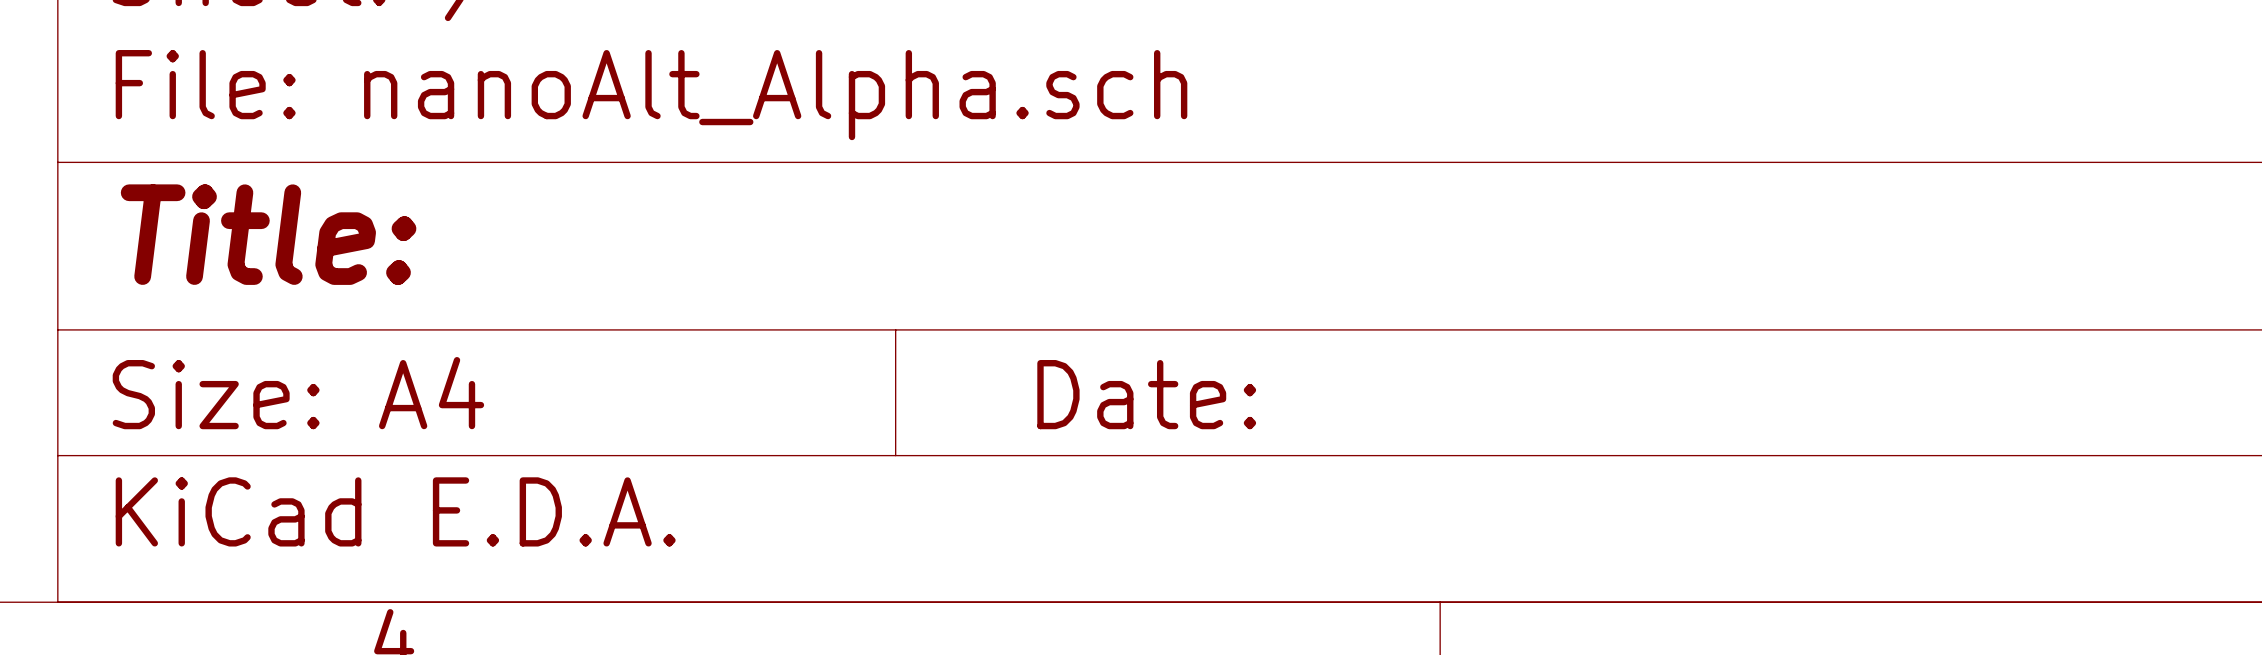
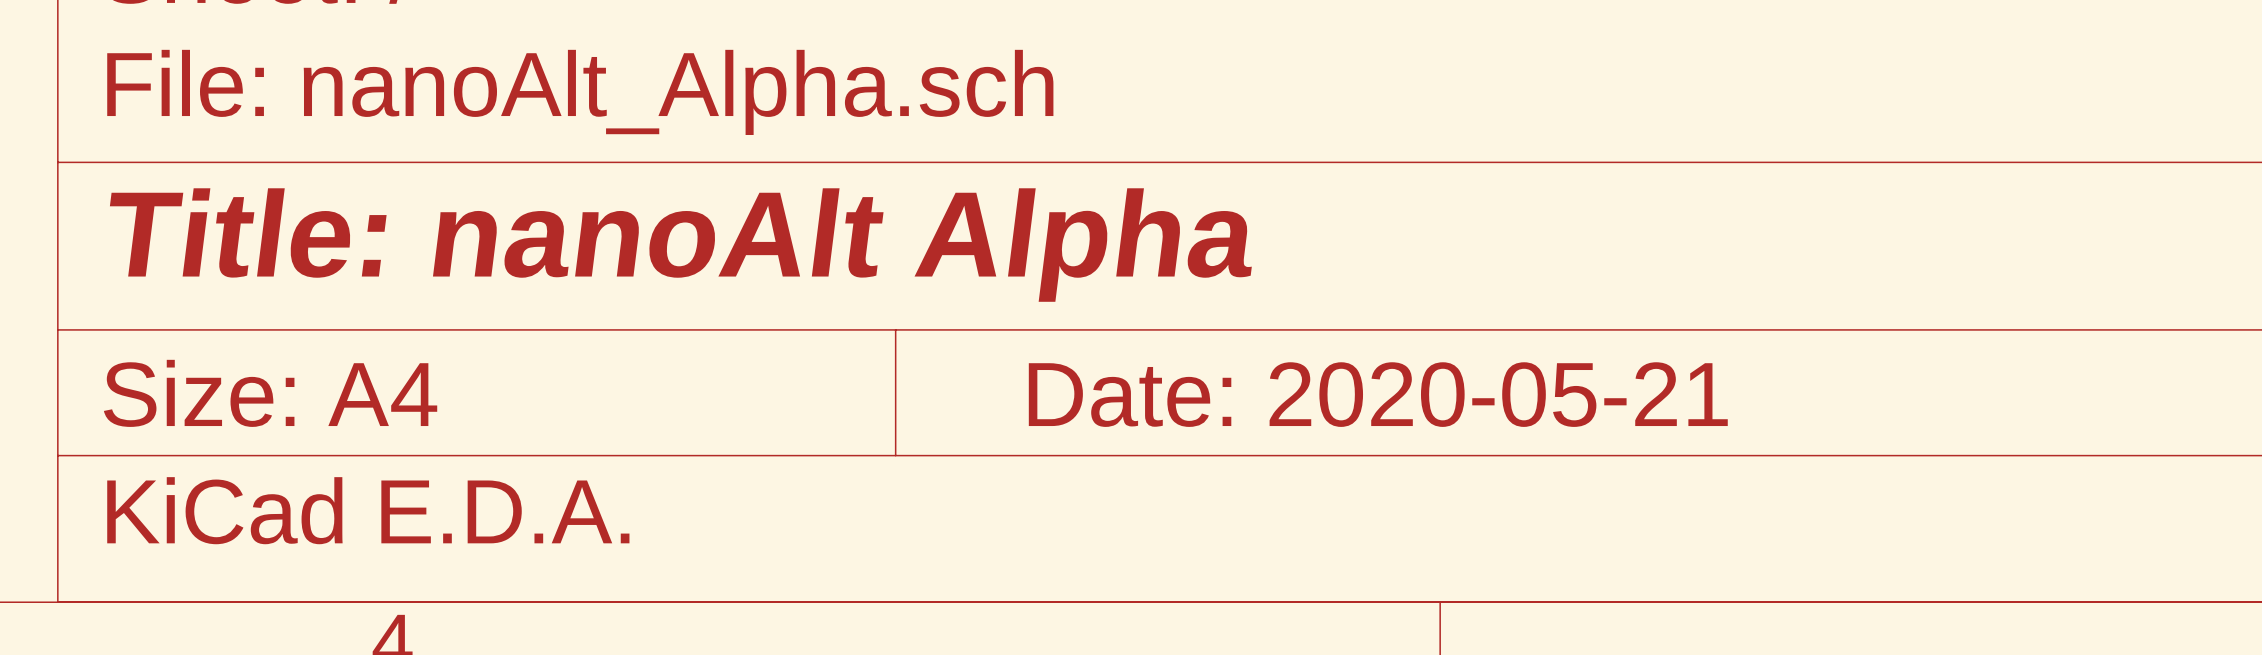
title block: Title: (268, 234) -> Title: nanoAlt Alpha (680, 245)
title block: Date: (1146, 394) -> Date: 2020-05-21 (1378, 394)

